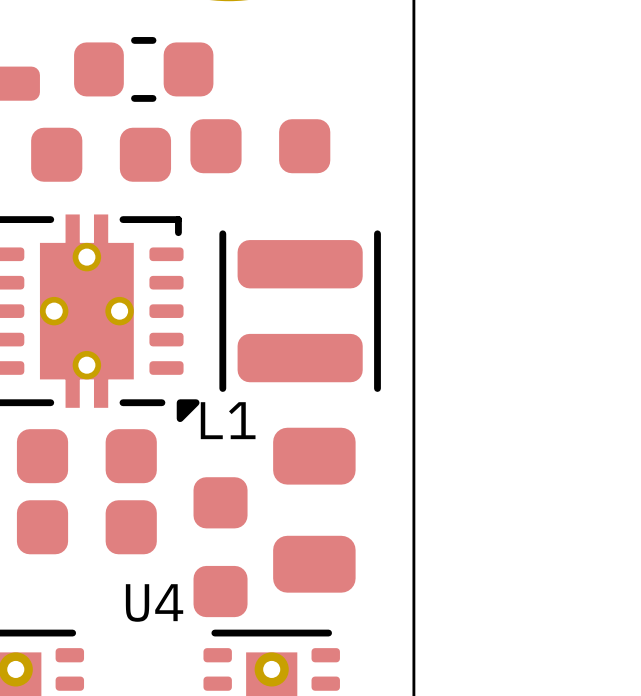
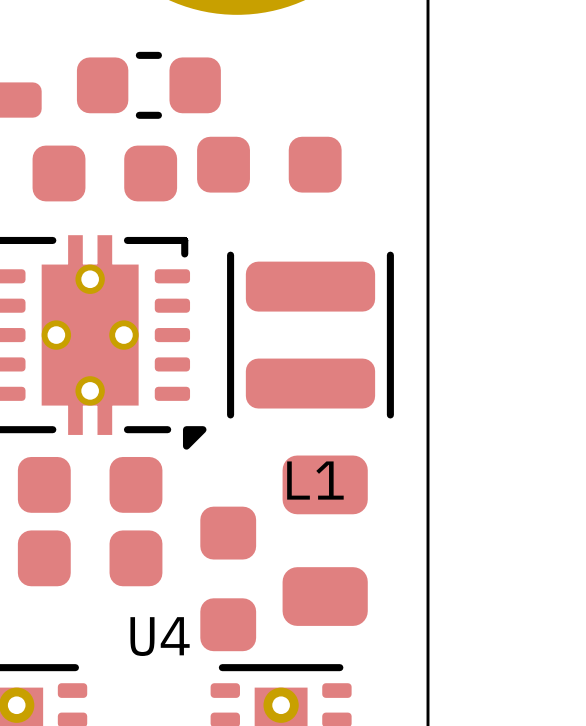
L1 name position: L1 (228, 420) -> L1 (315, 480)

